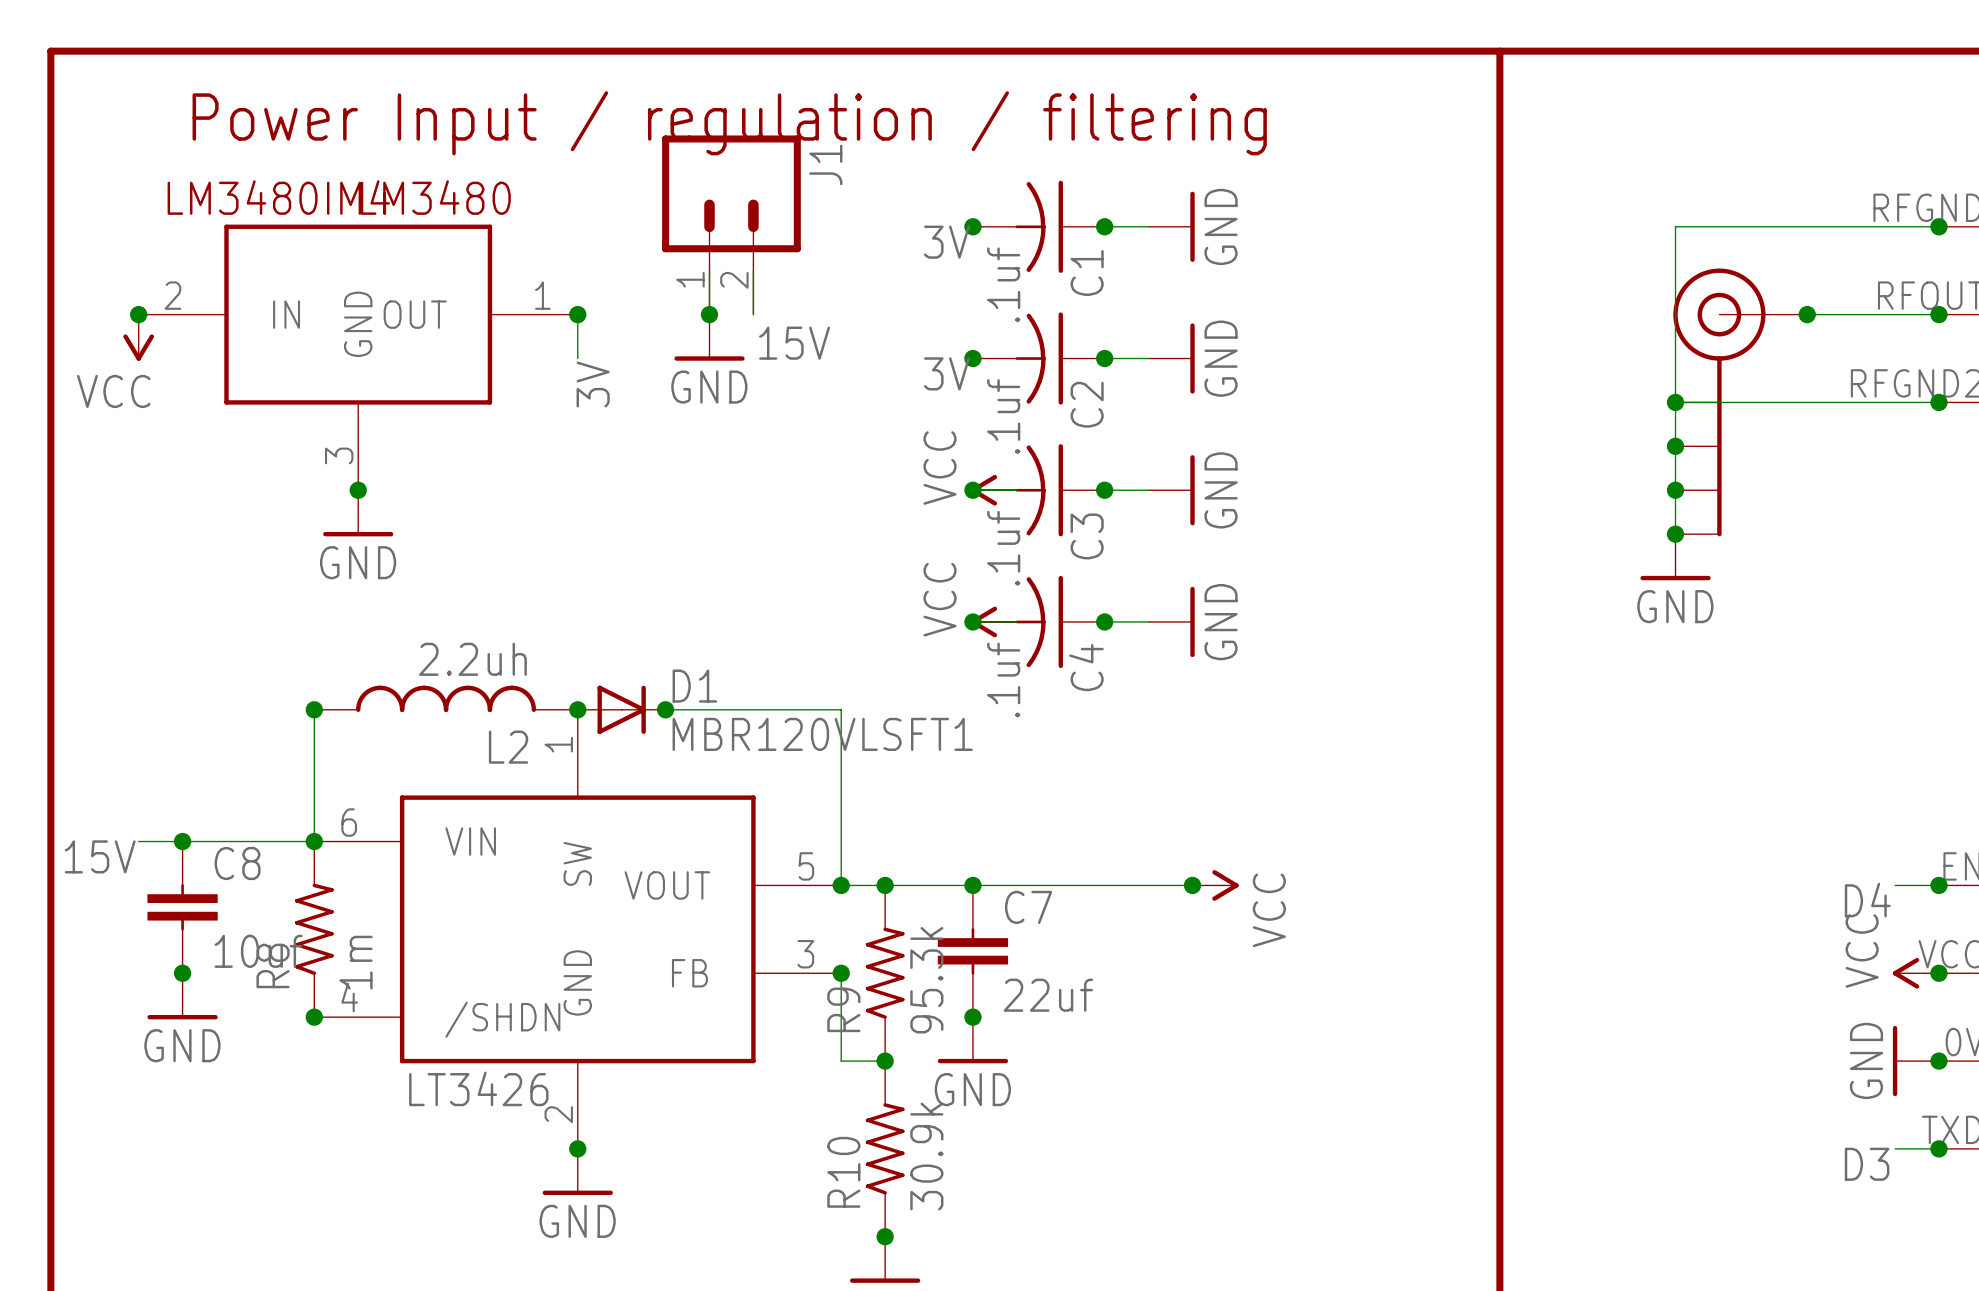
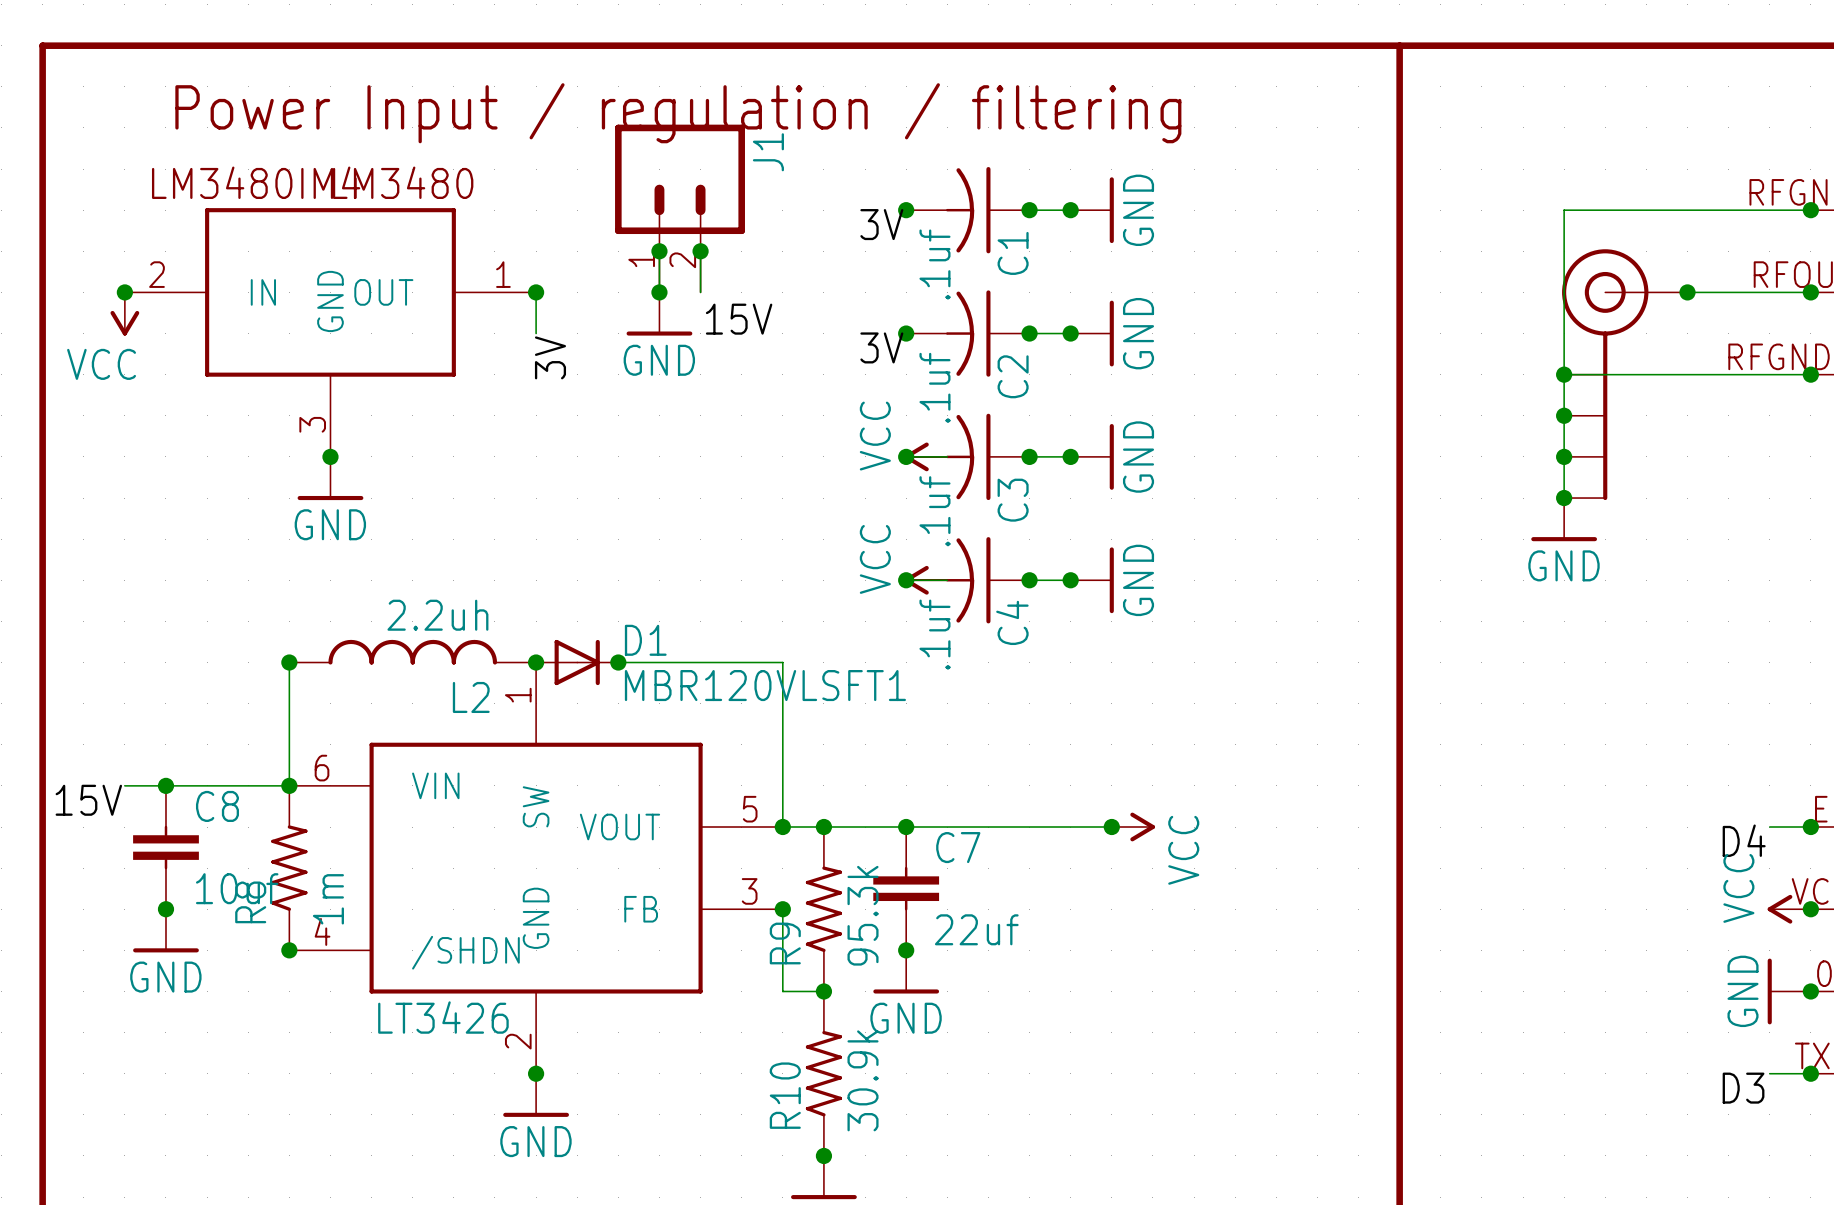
junction: none -> (1070, 210)
junction: none -> (659, 251)
junction: none -> (700, 251)
junction: none -> (1070, 333)
junction: none -> (1070, 456)
junction: none -> (1070, 580)

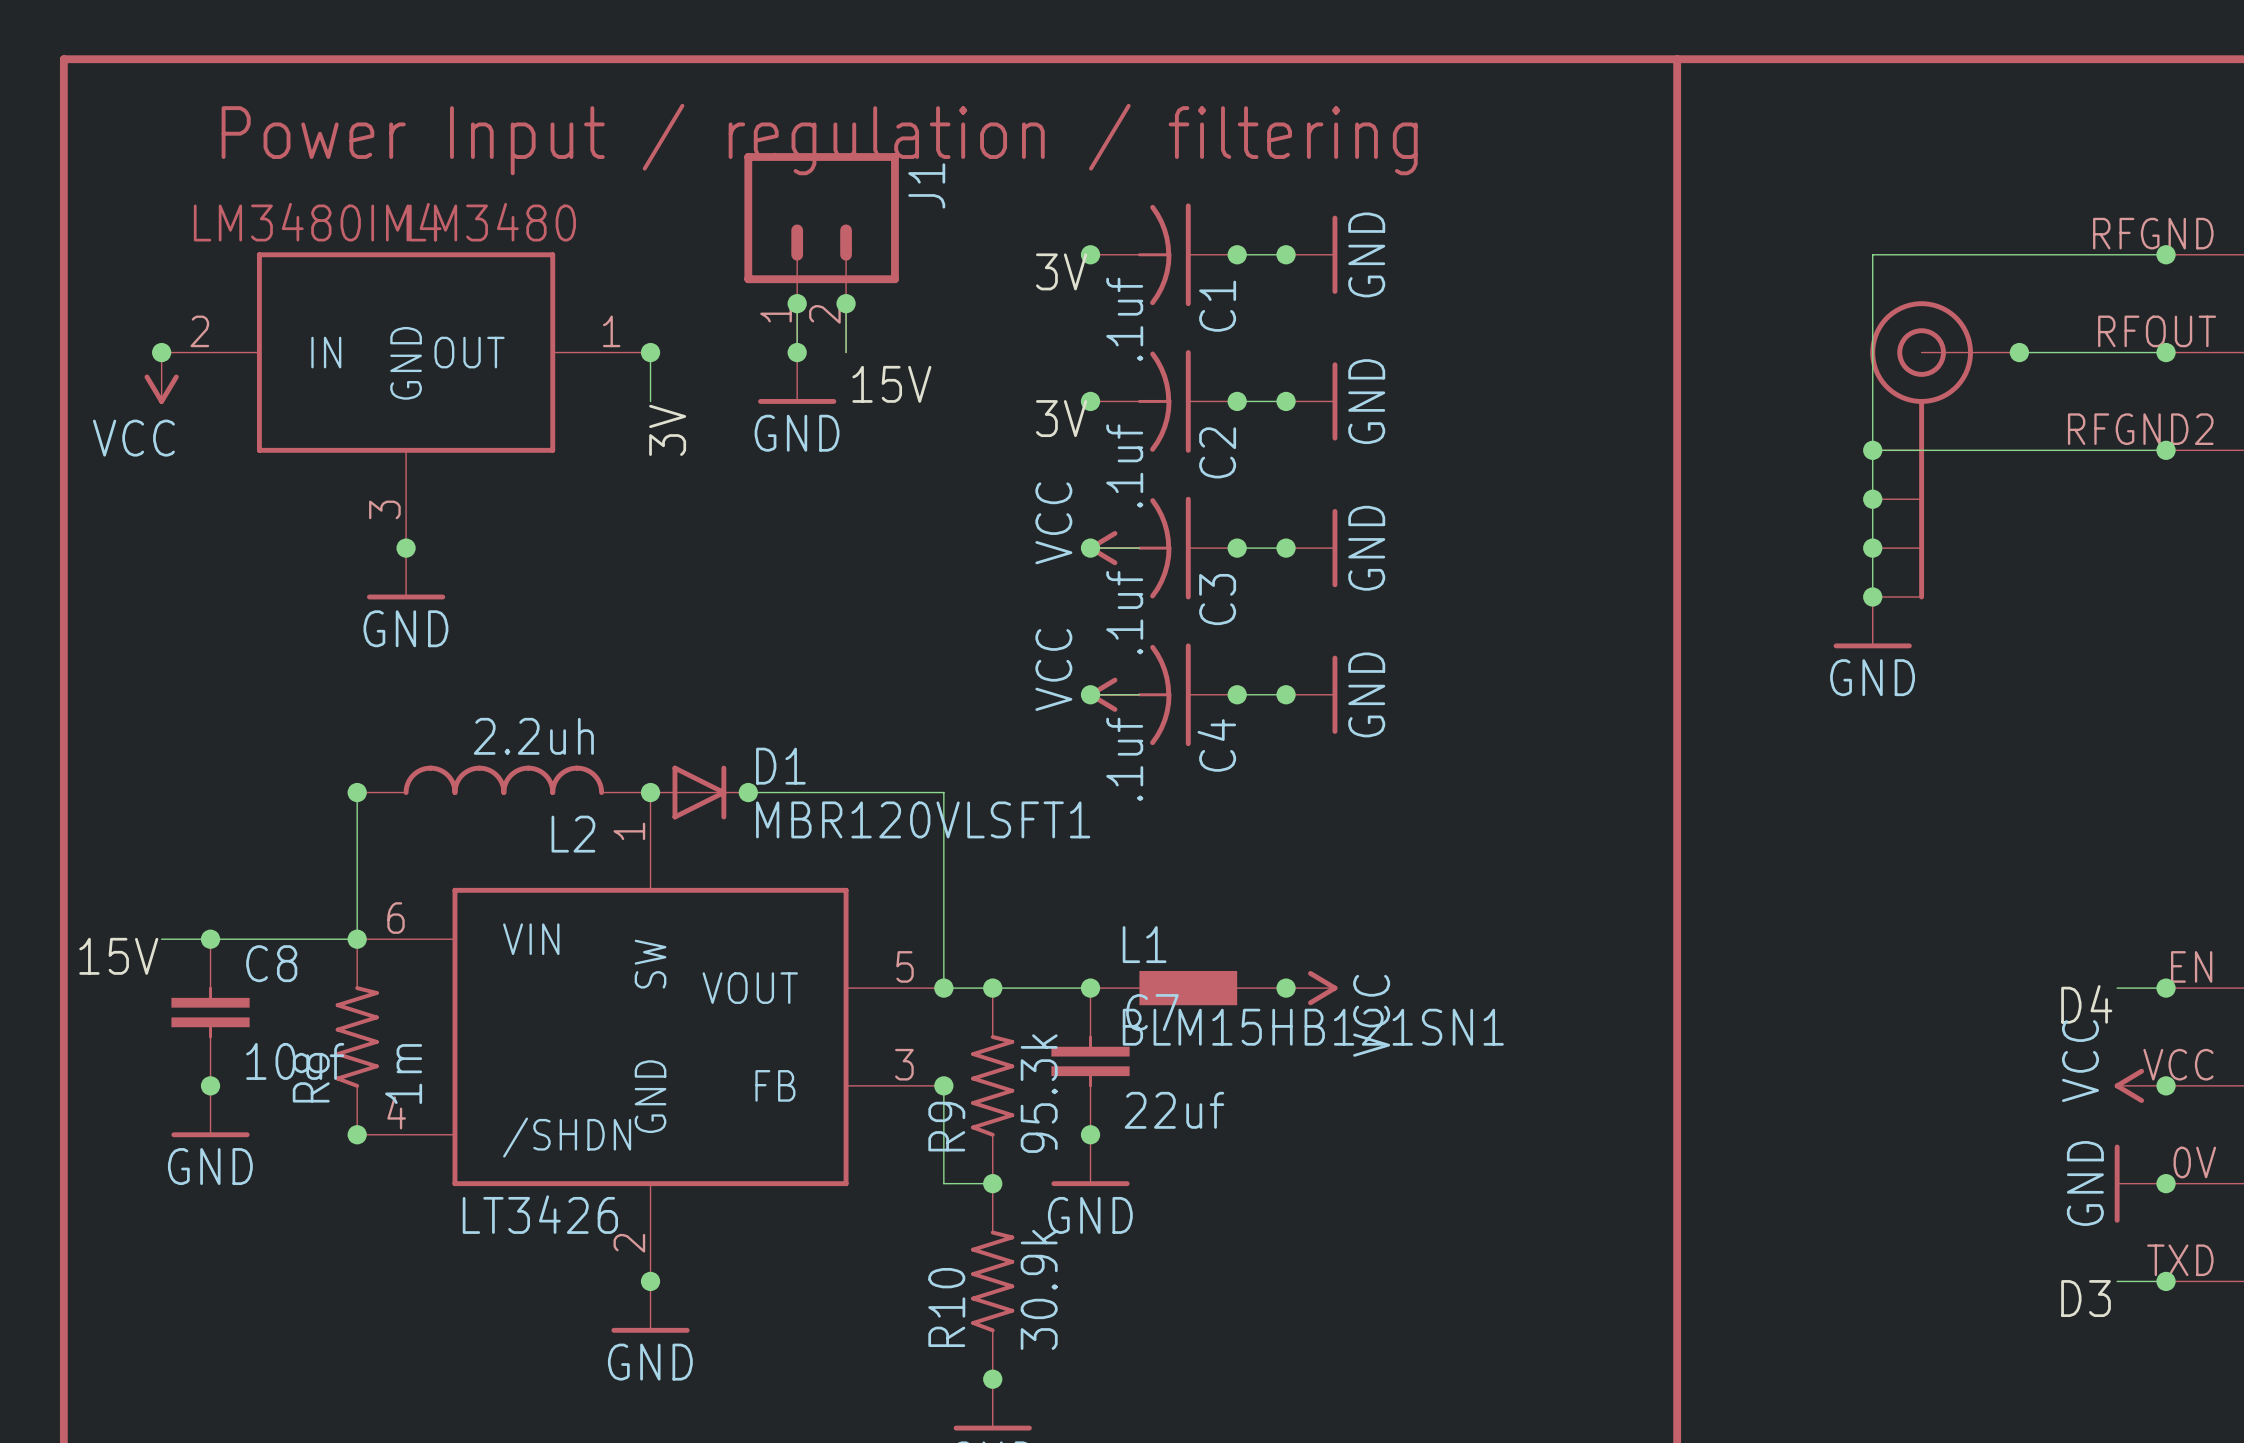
L1: none -> BLM15HB121SN1 (1188, 988)
junction position: (1111, 827) -> (1286, 988)
power symbol position: VCC (1133, 827) -> VCC (1311, 988)

